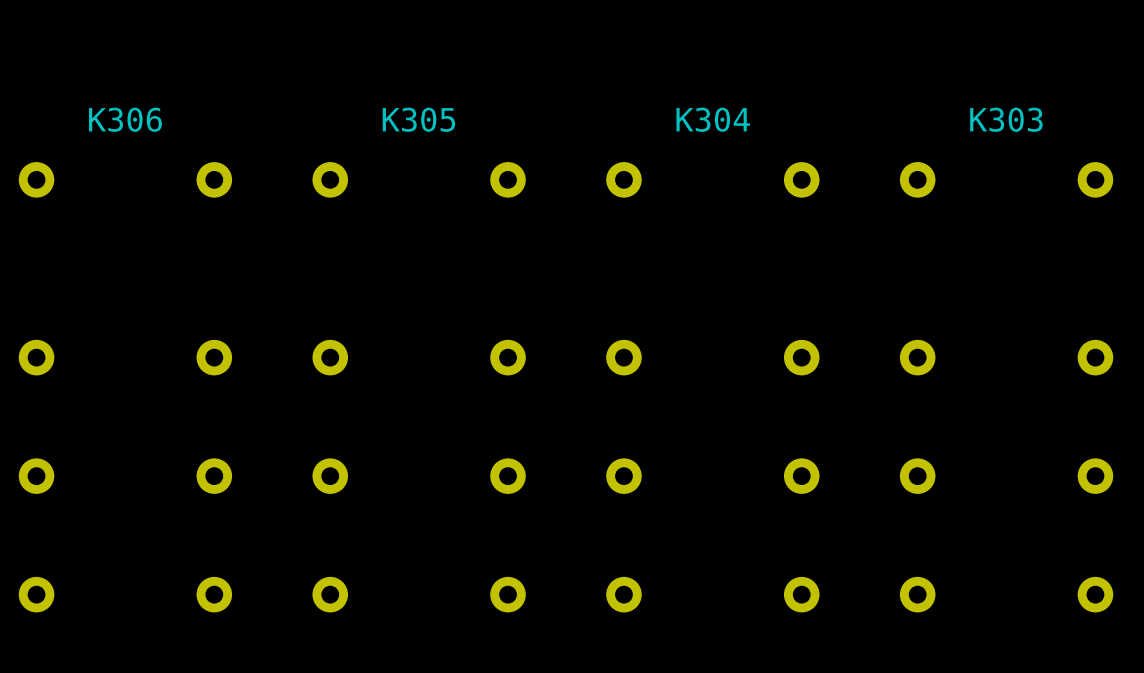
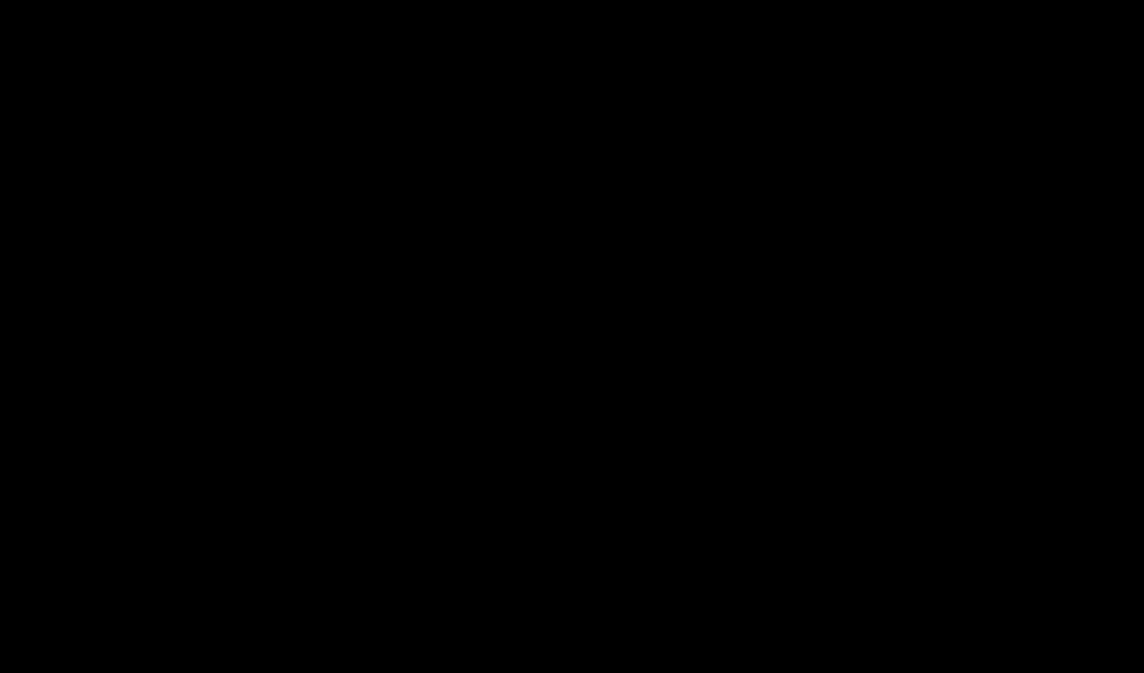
K306: (125, 387) -> none
K305: (419, 387) -> none
K304: (712, 387) -> none
K303: (1006, 387) -> none

